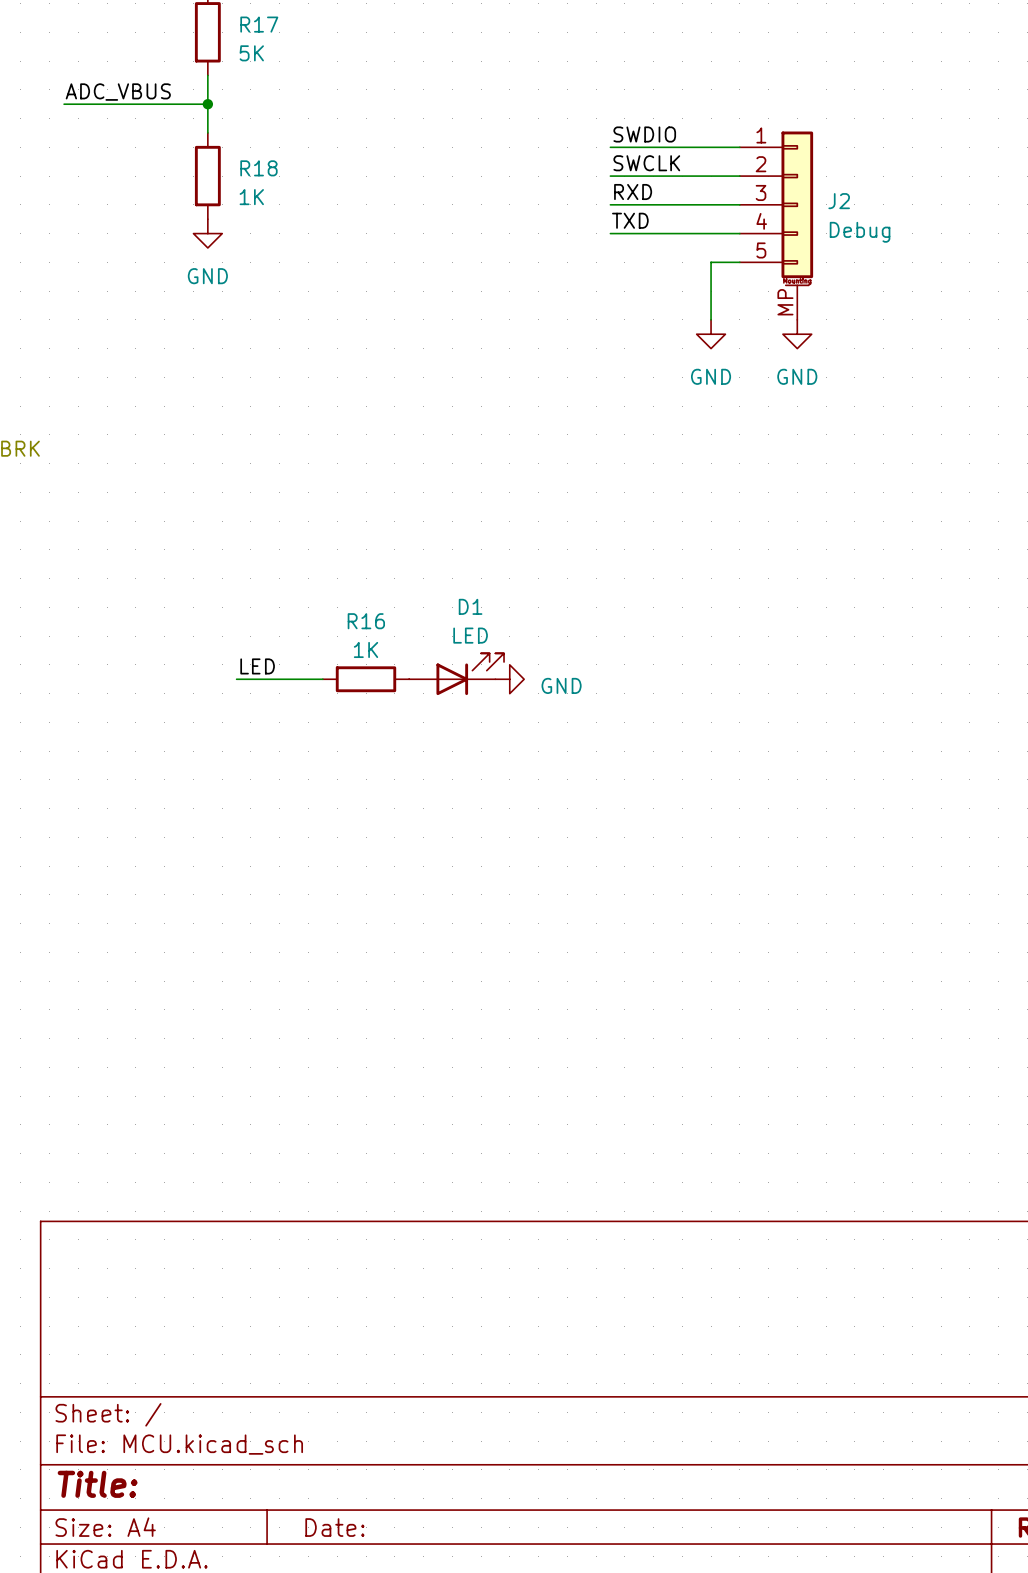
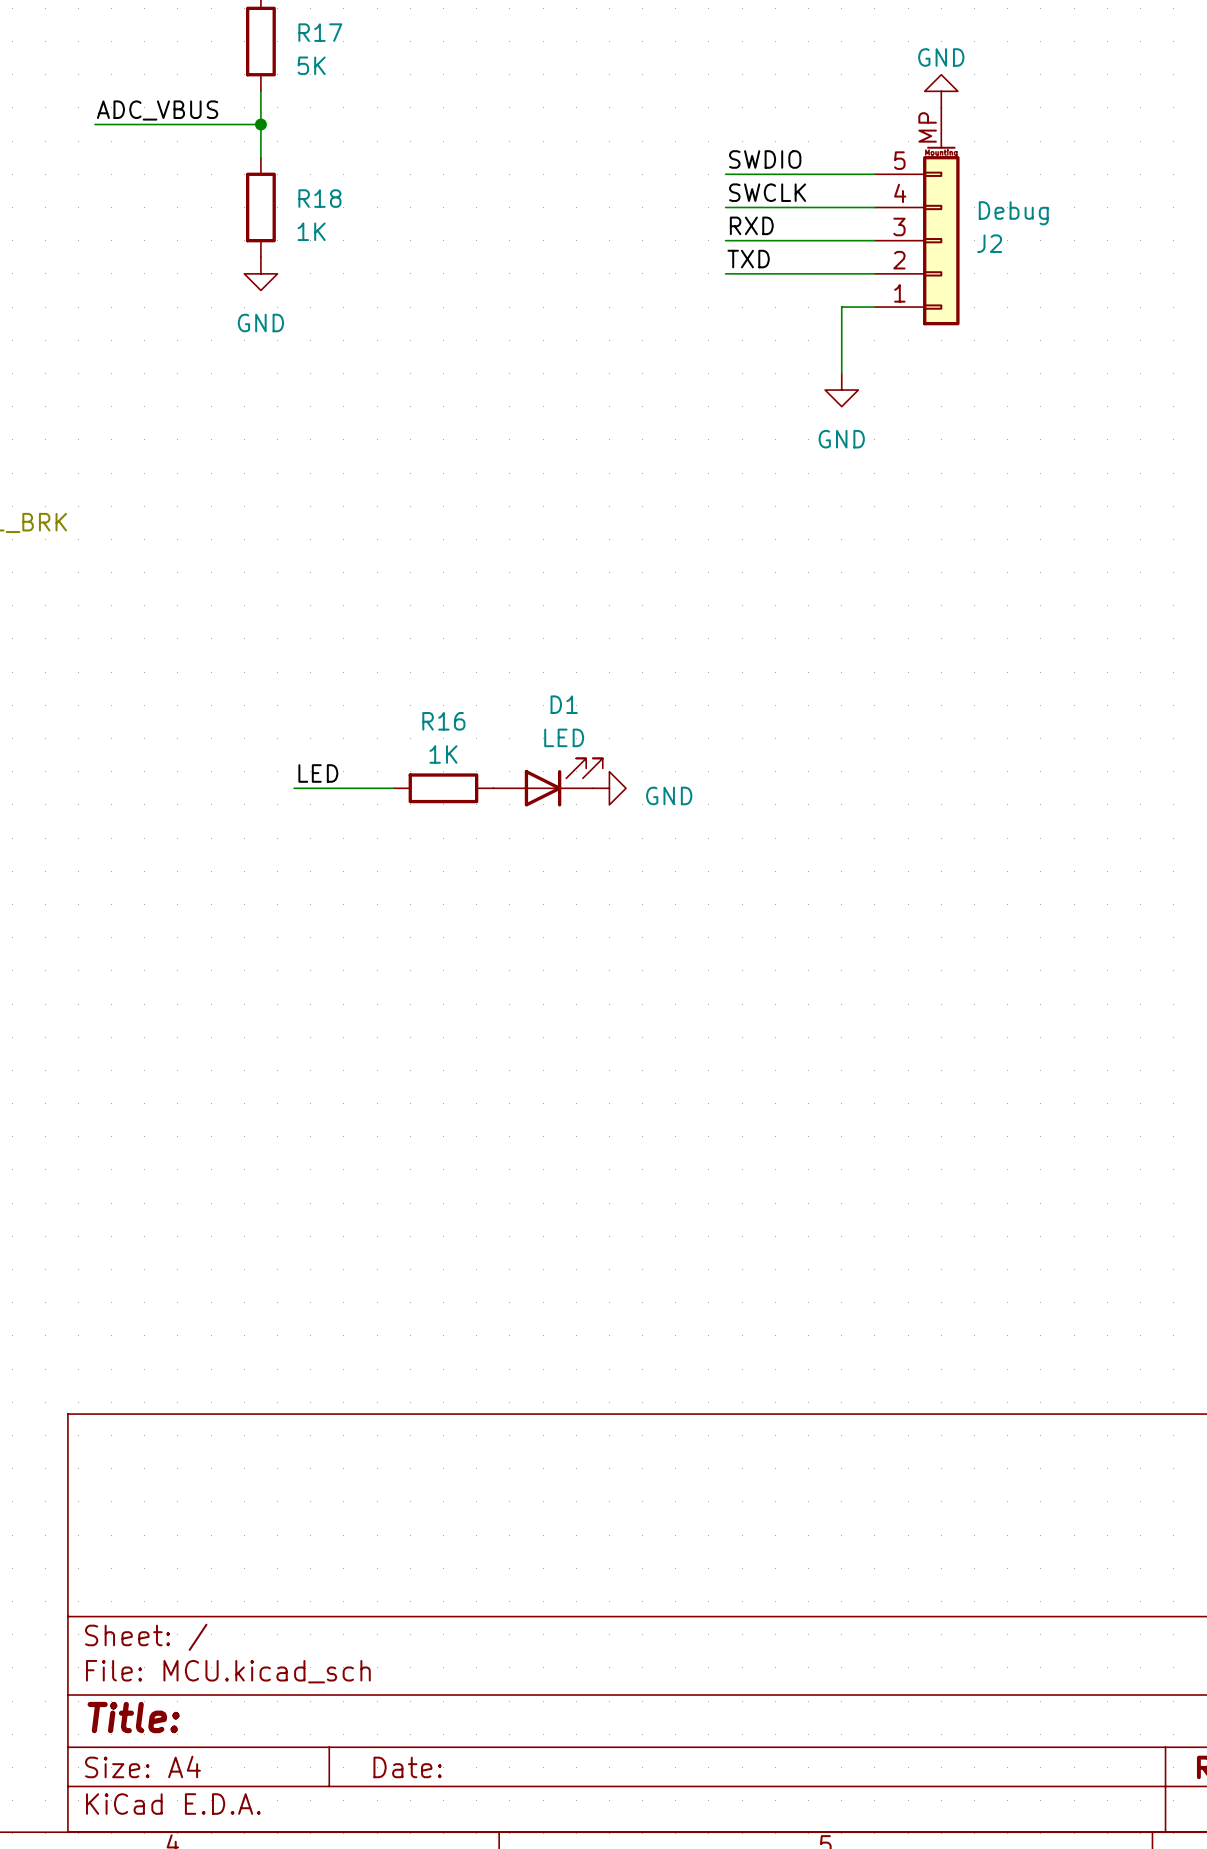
J2 flip: as is (797, 208) -> up-down (941, 236)
power symbol rotation: 0° (797, 334) -> 180° (941, 91)
power symbol position: GND (797, 334) -> GND (941, 91)

